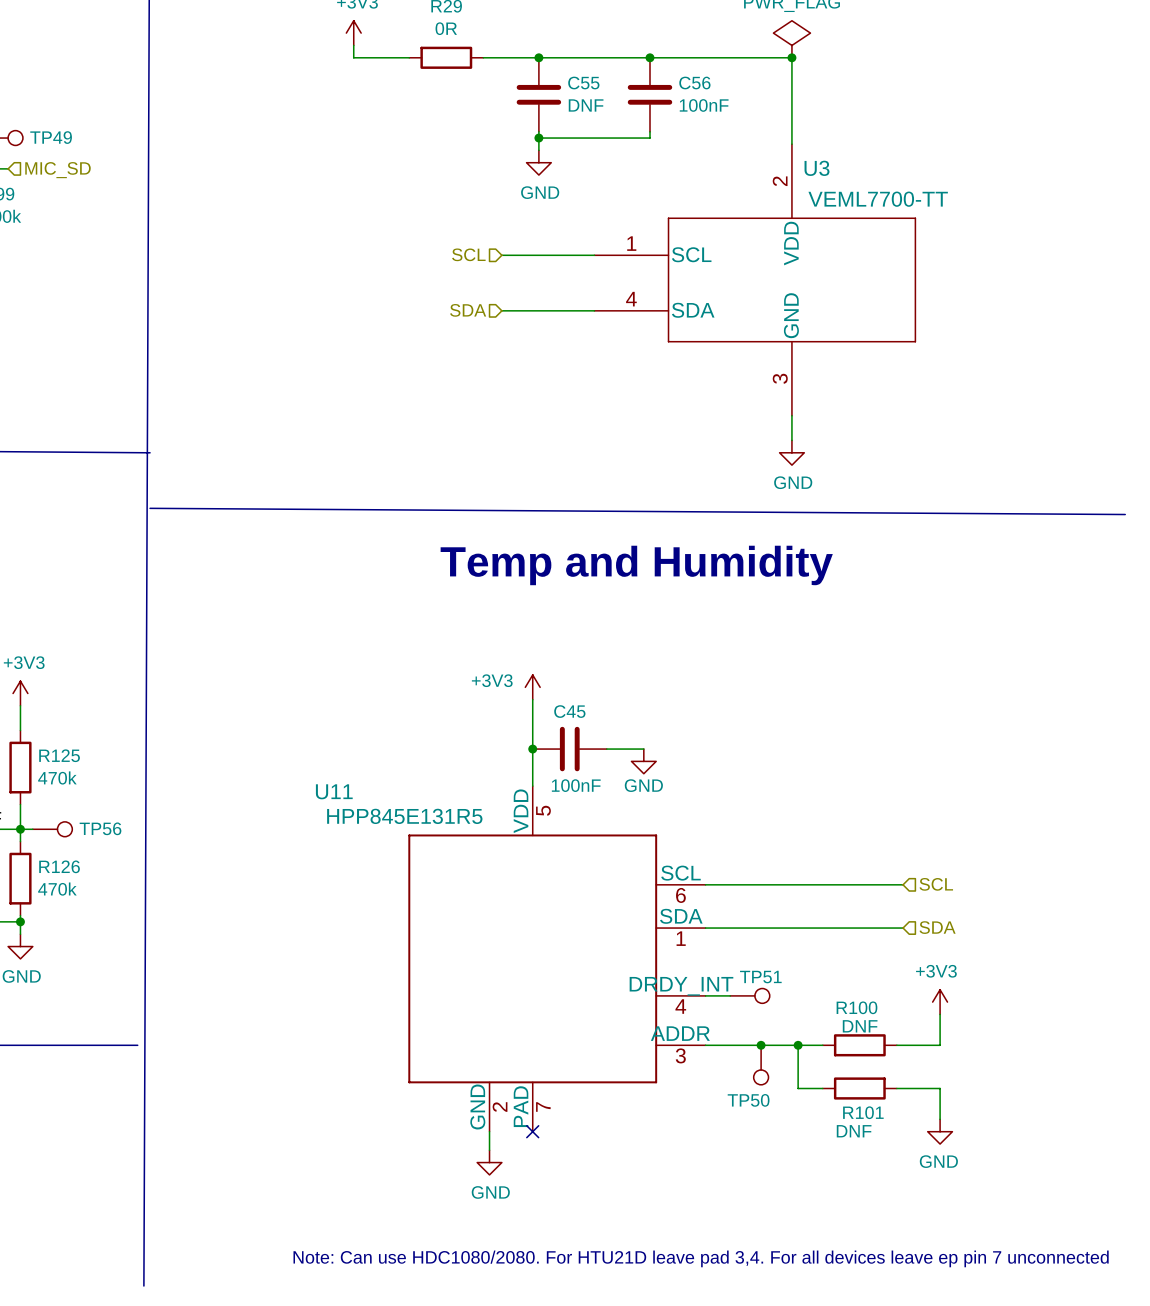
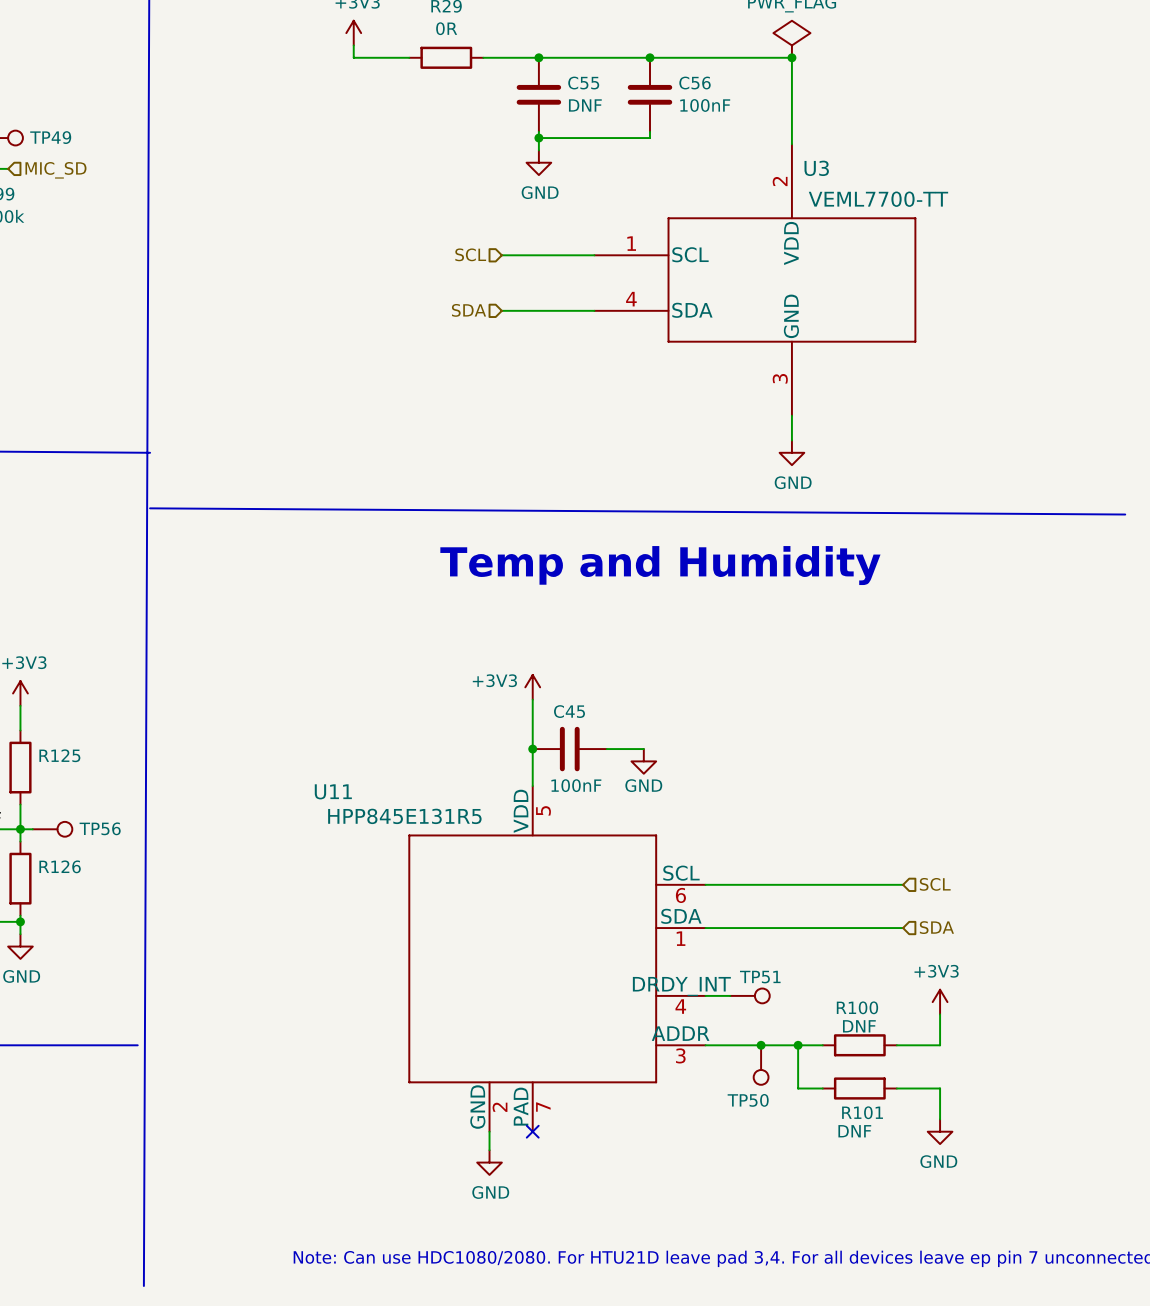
R125 value: 470k (57, 777) -> none
R126 value: 470k (57, 889) -> none

